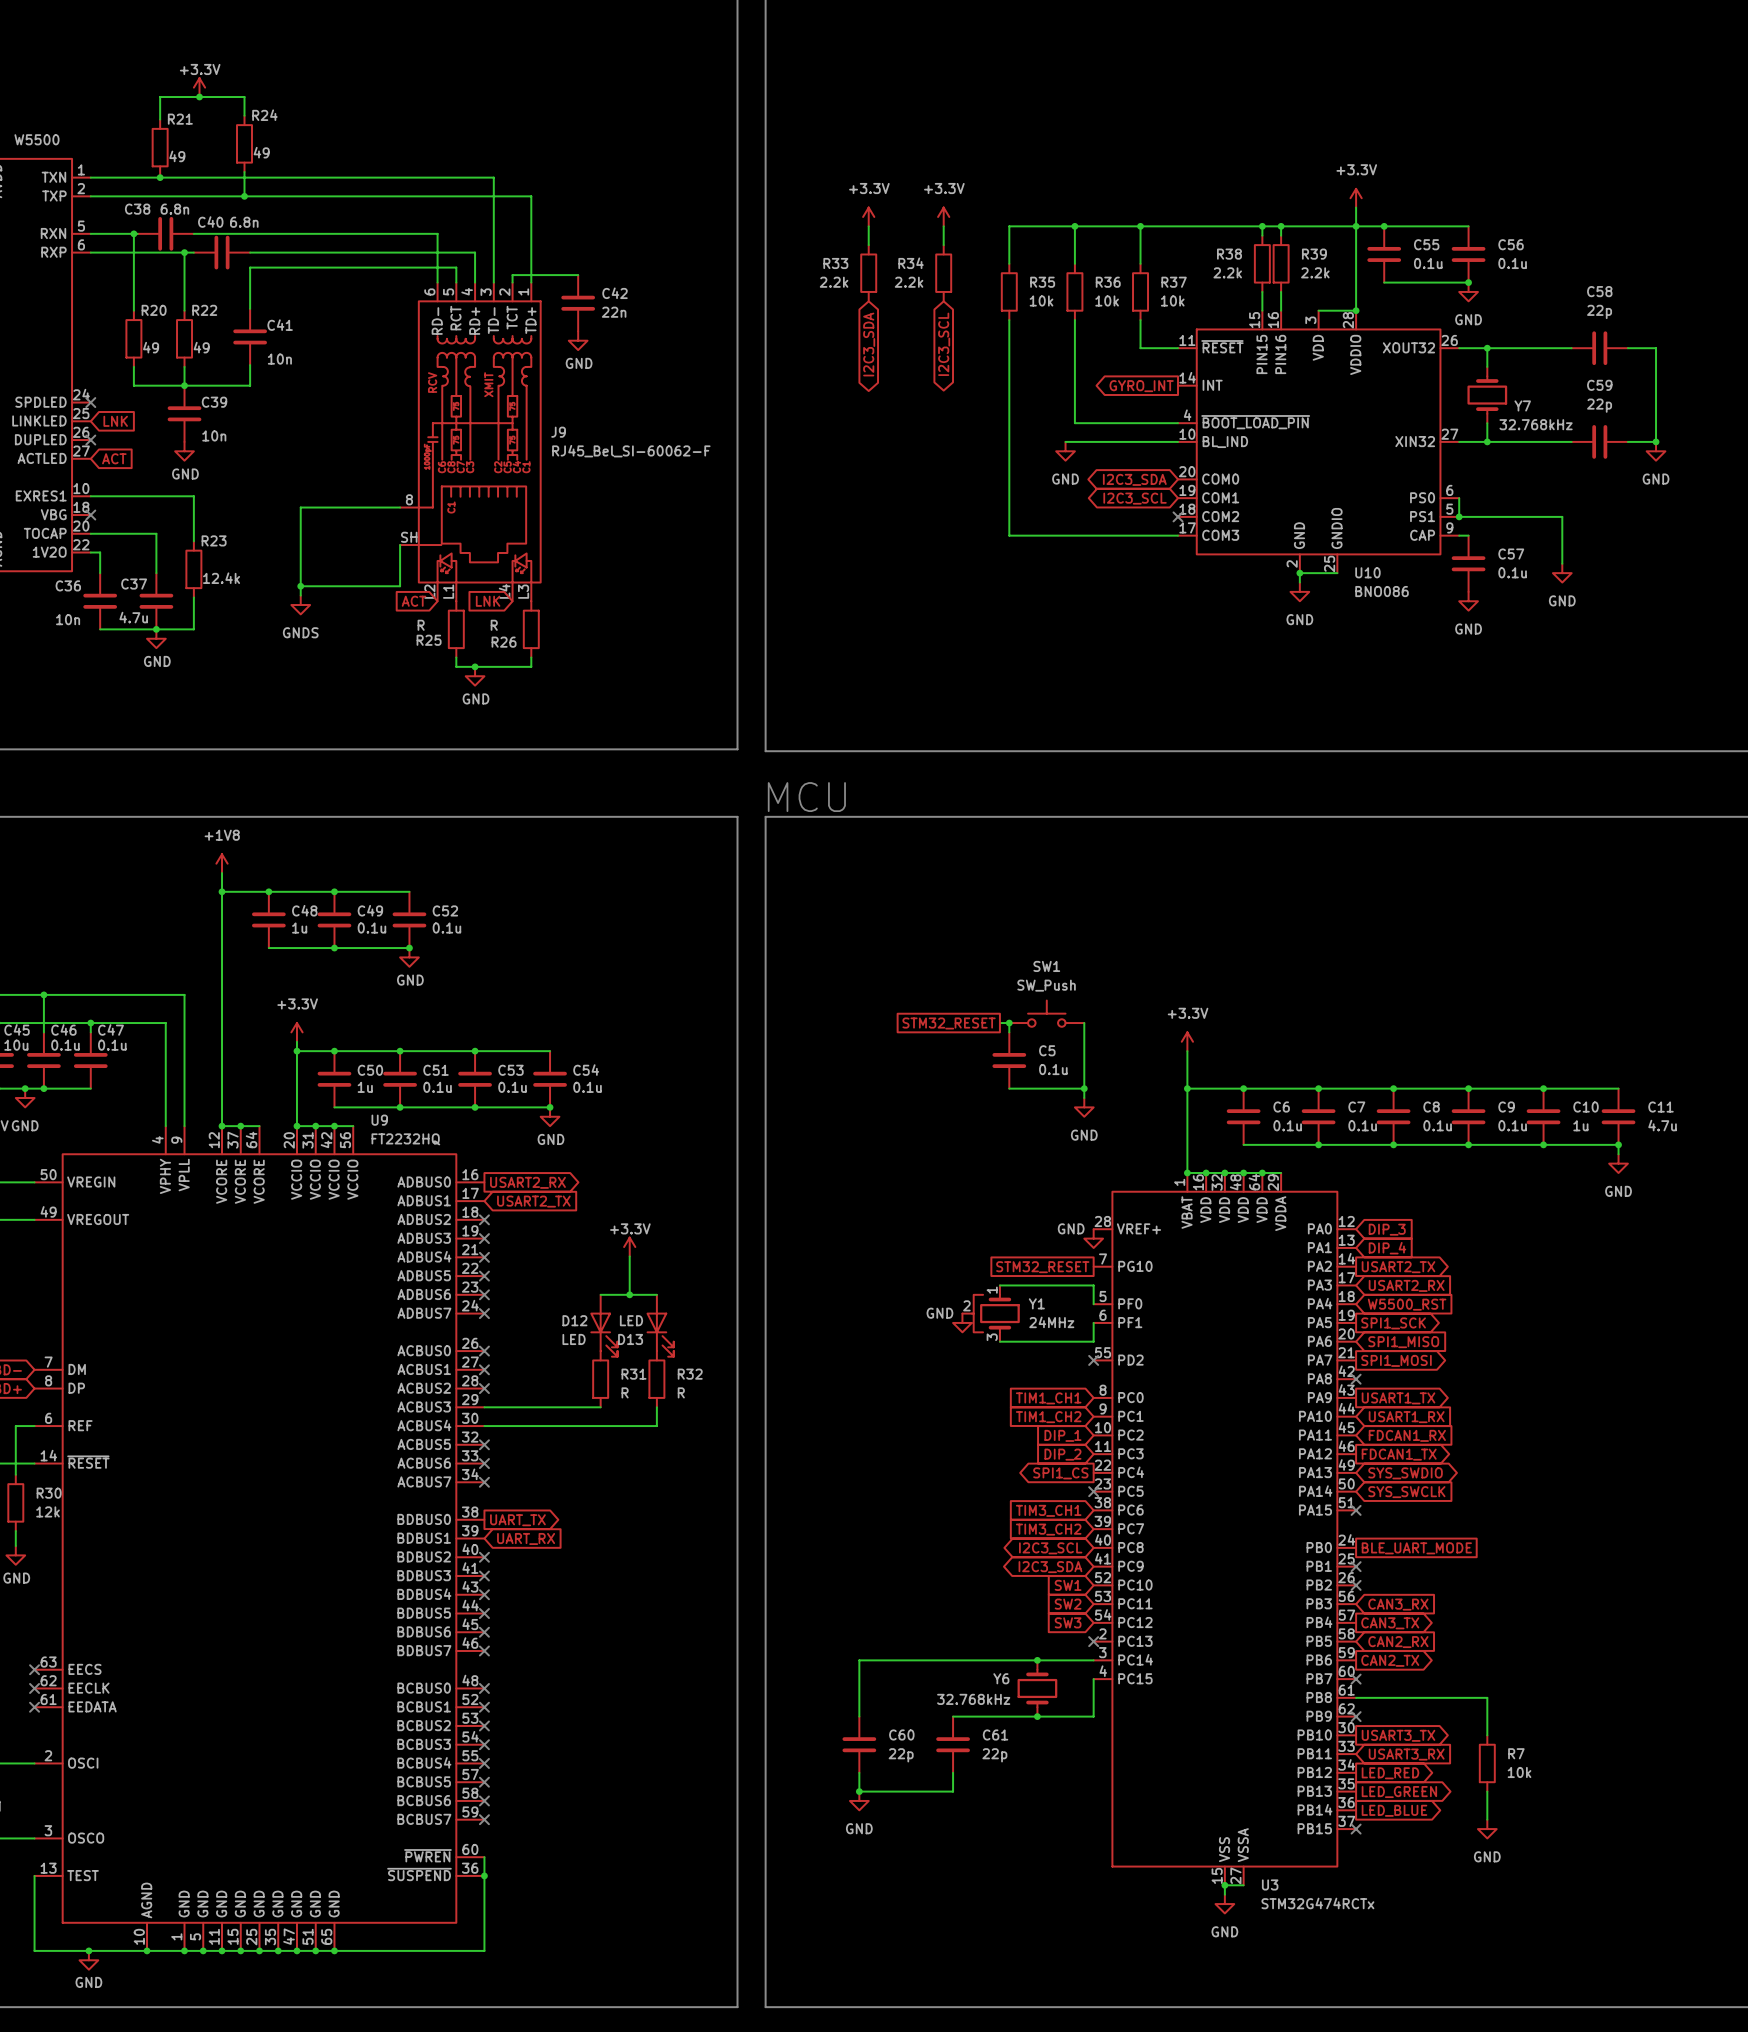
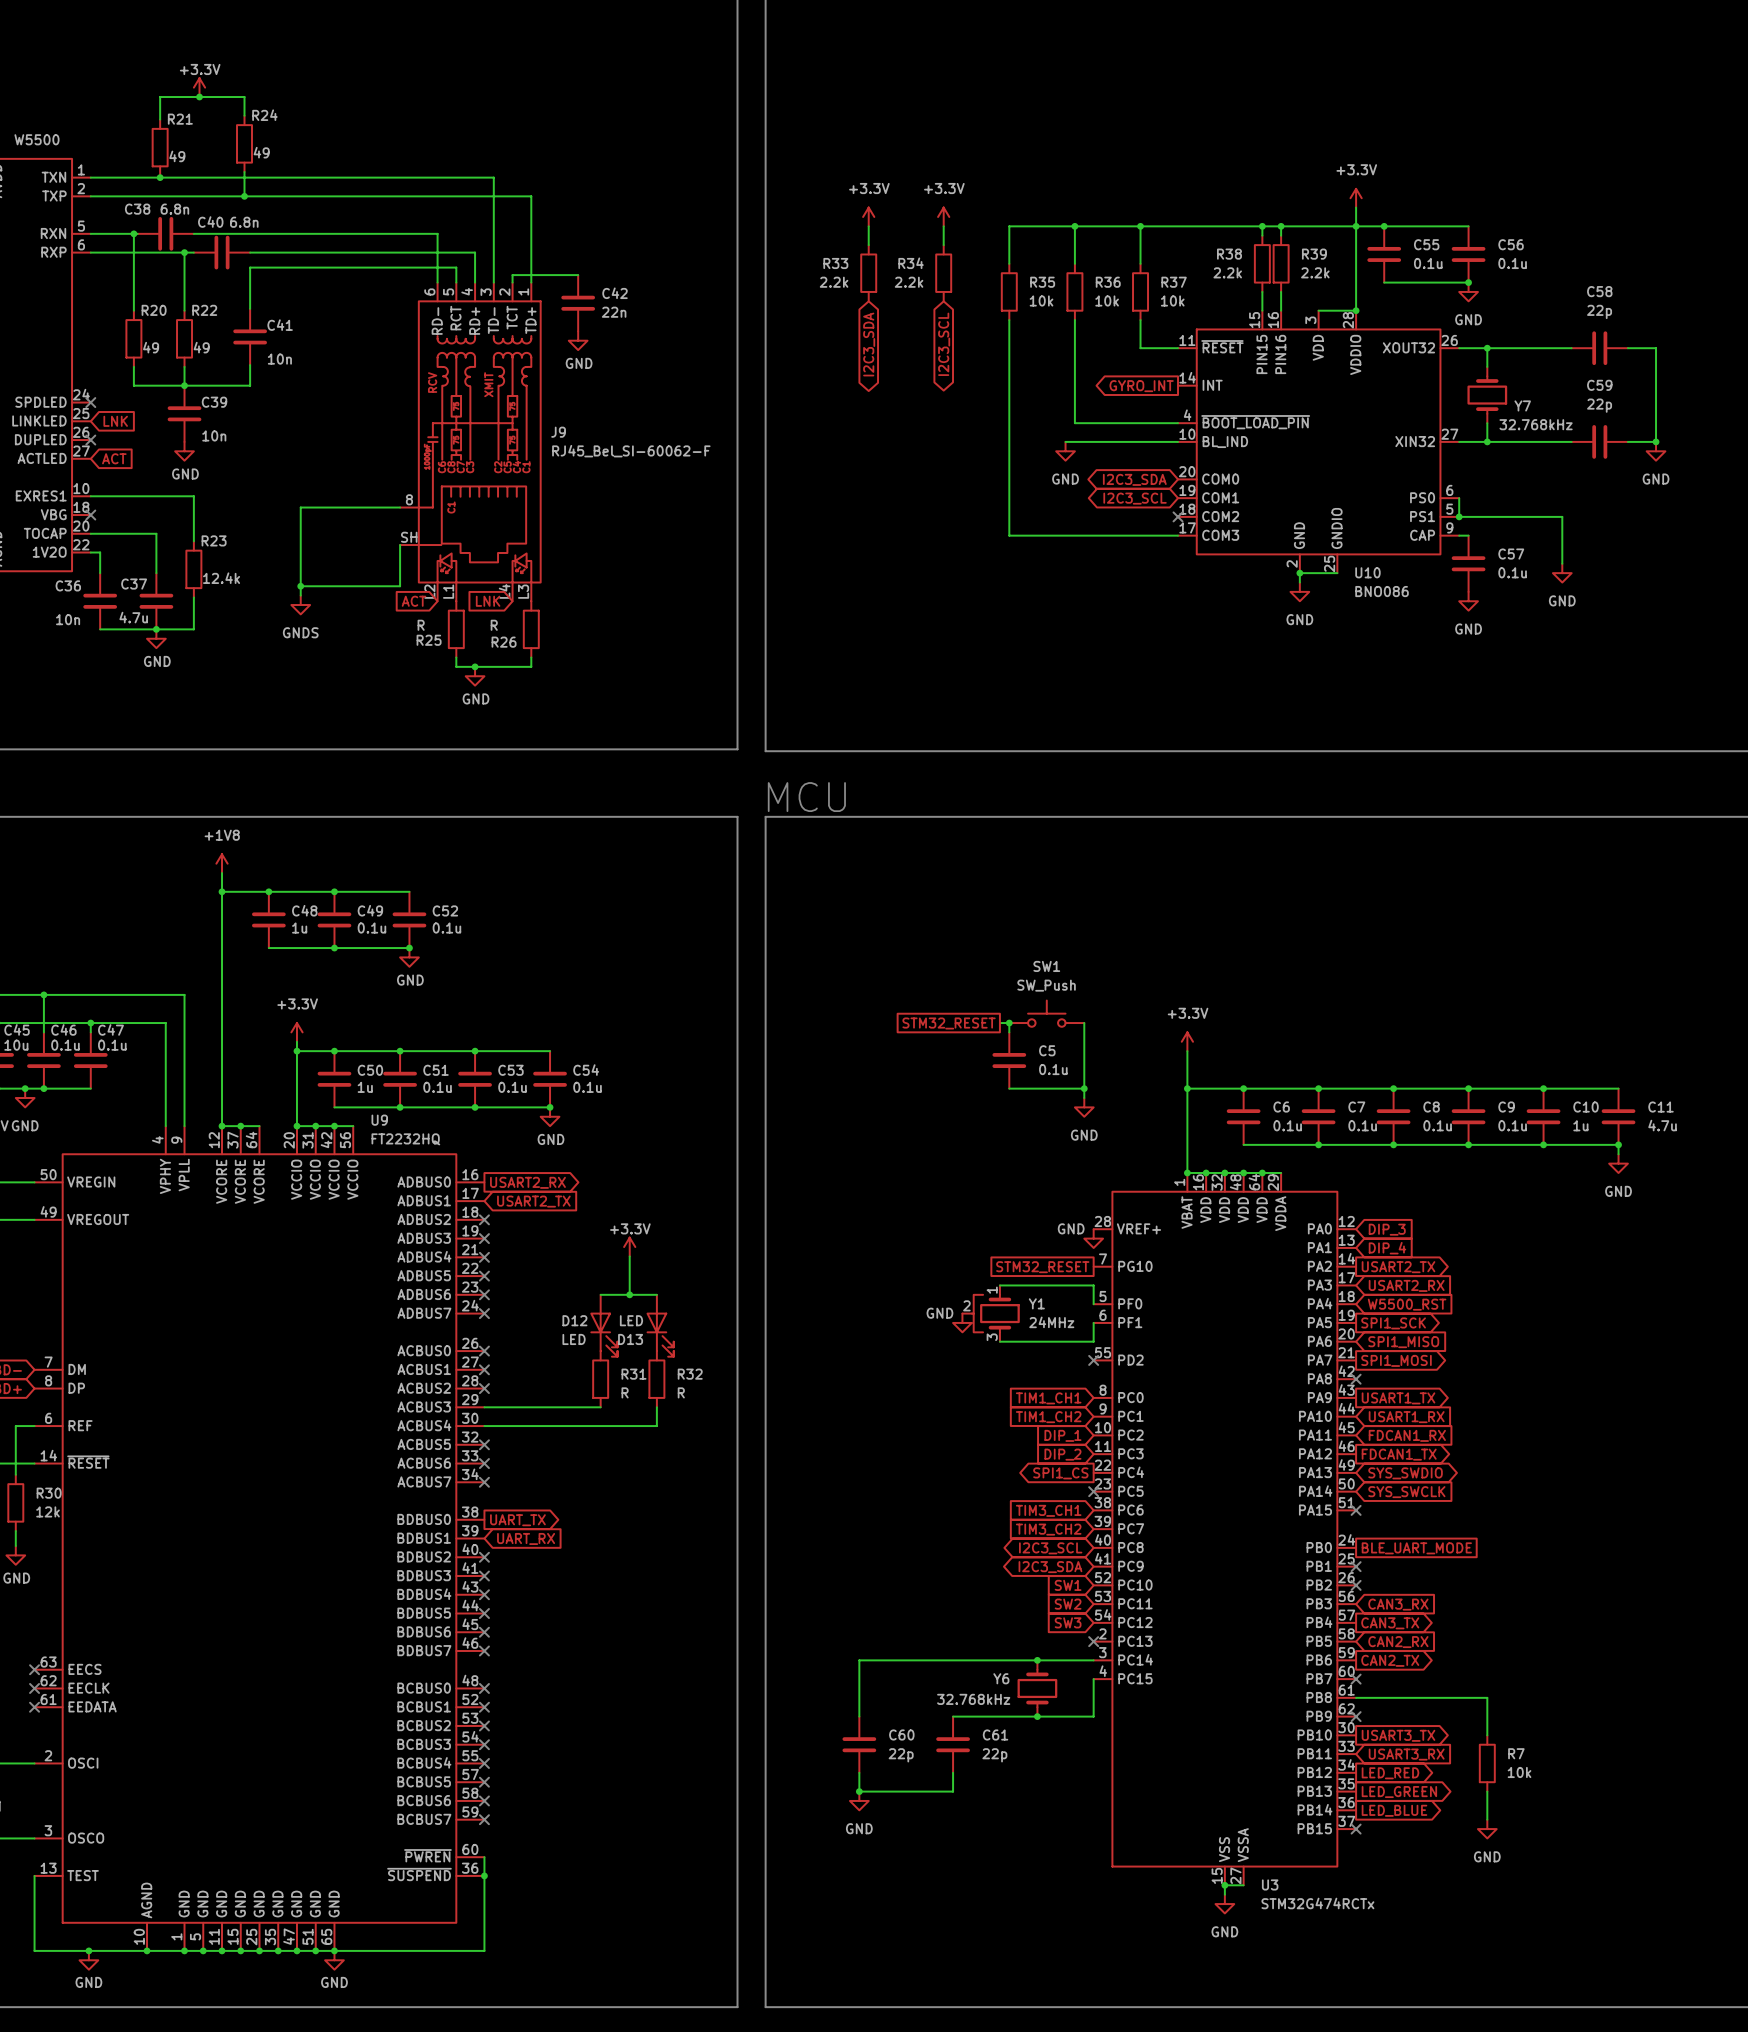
power symbol: none -> GND (334, 1960)

